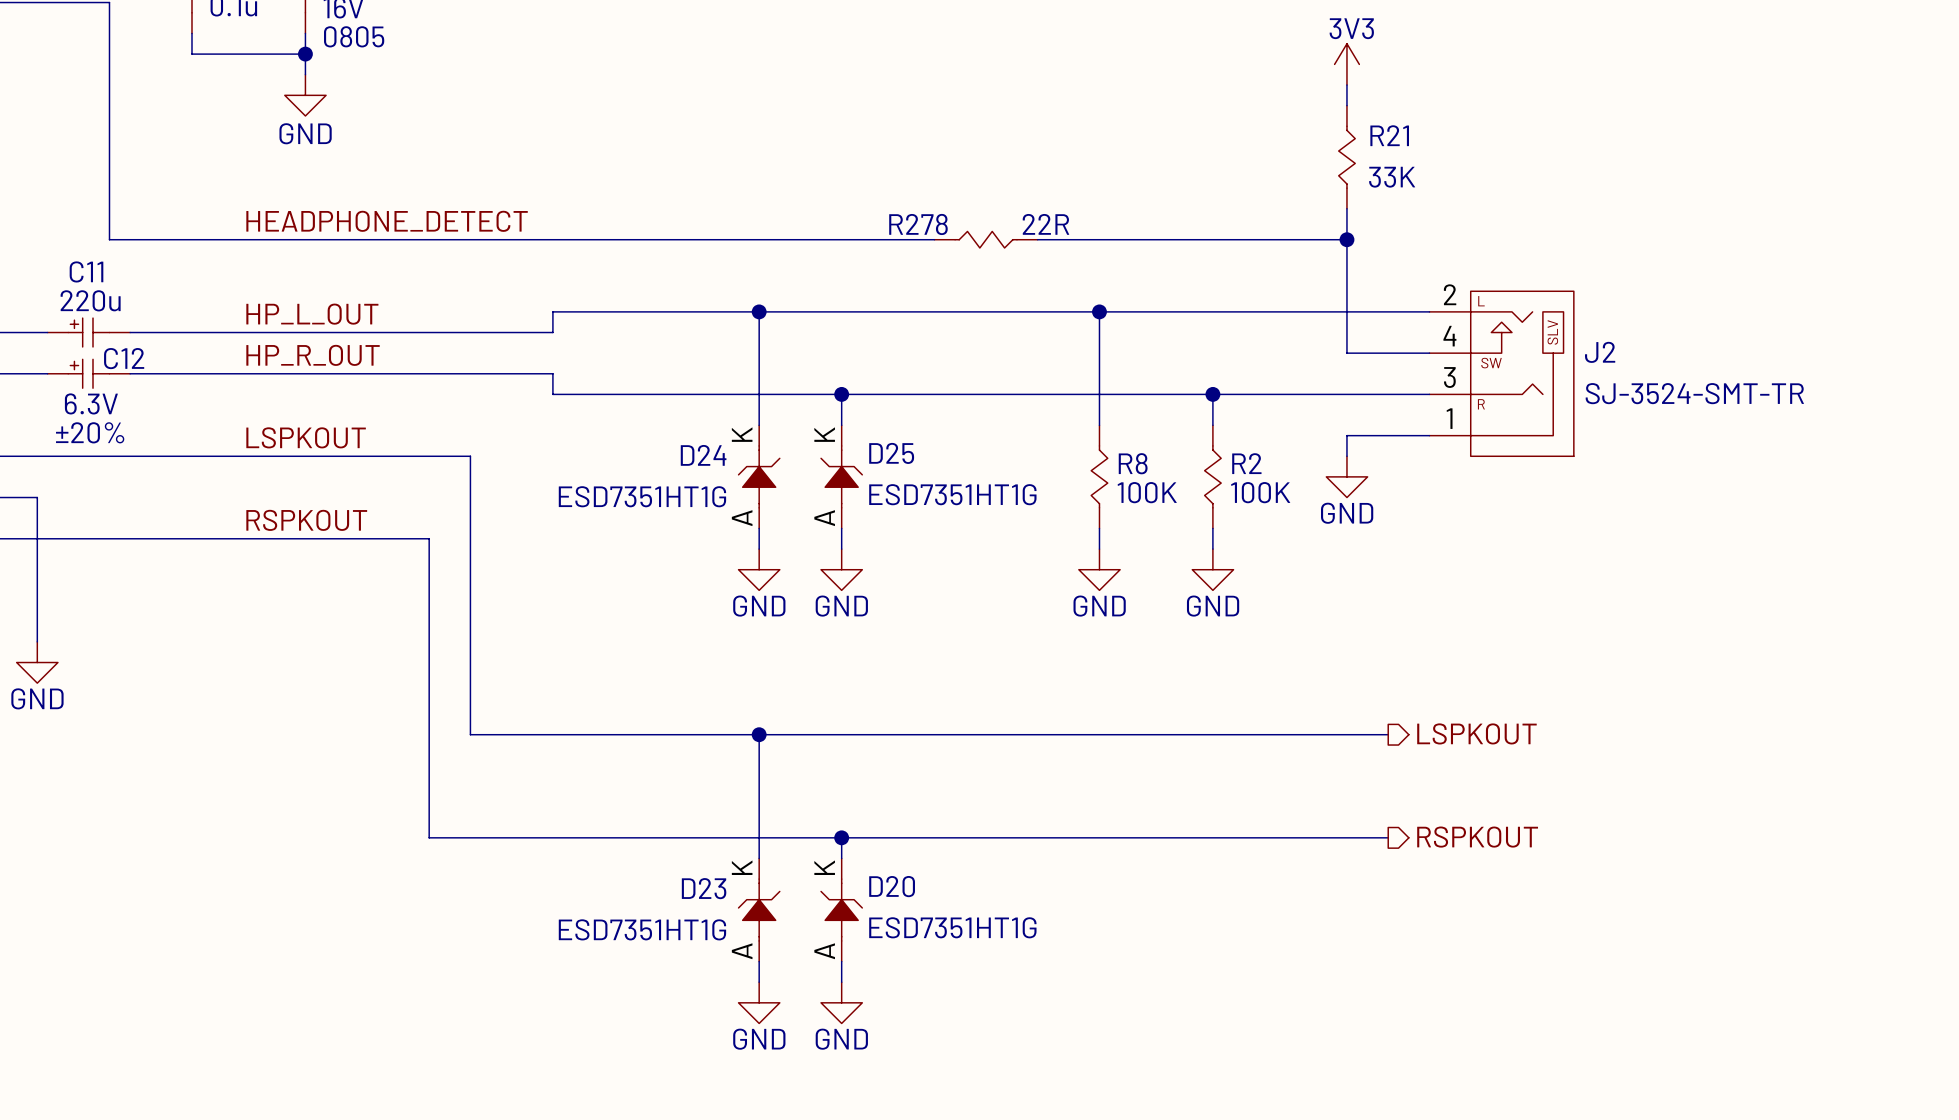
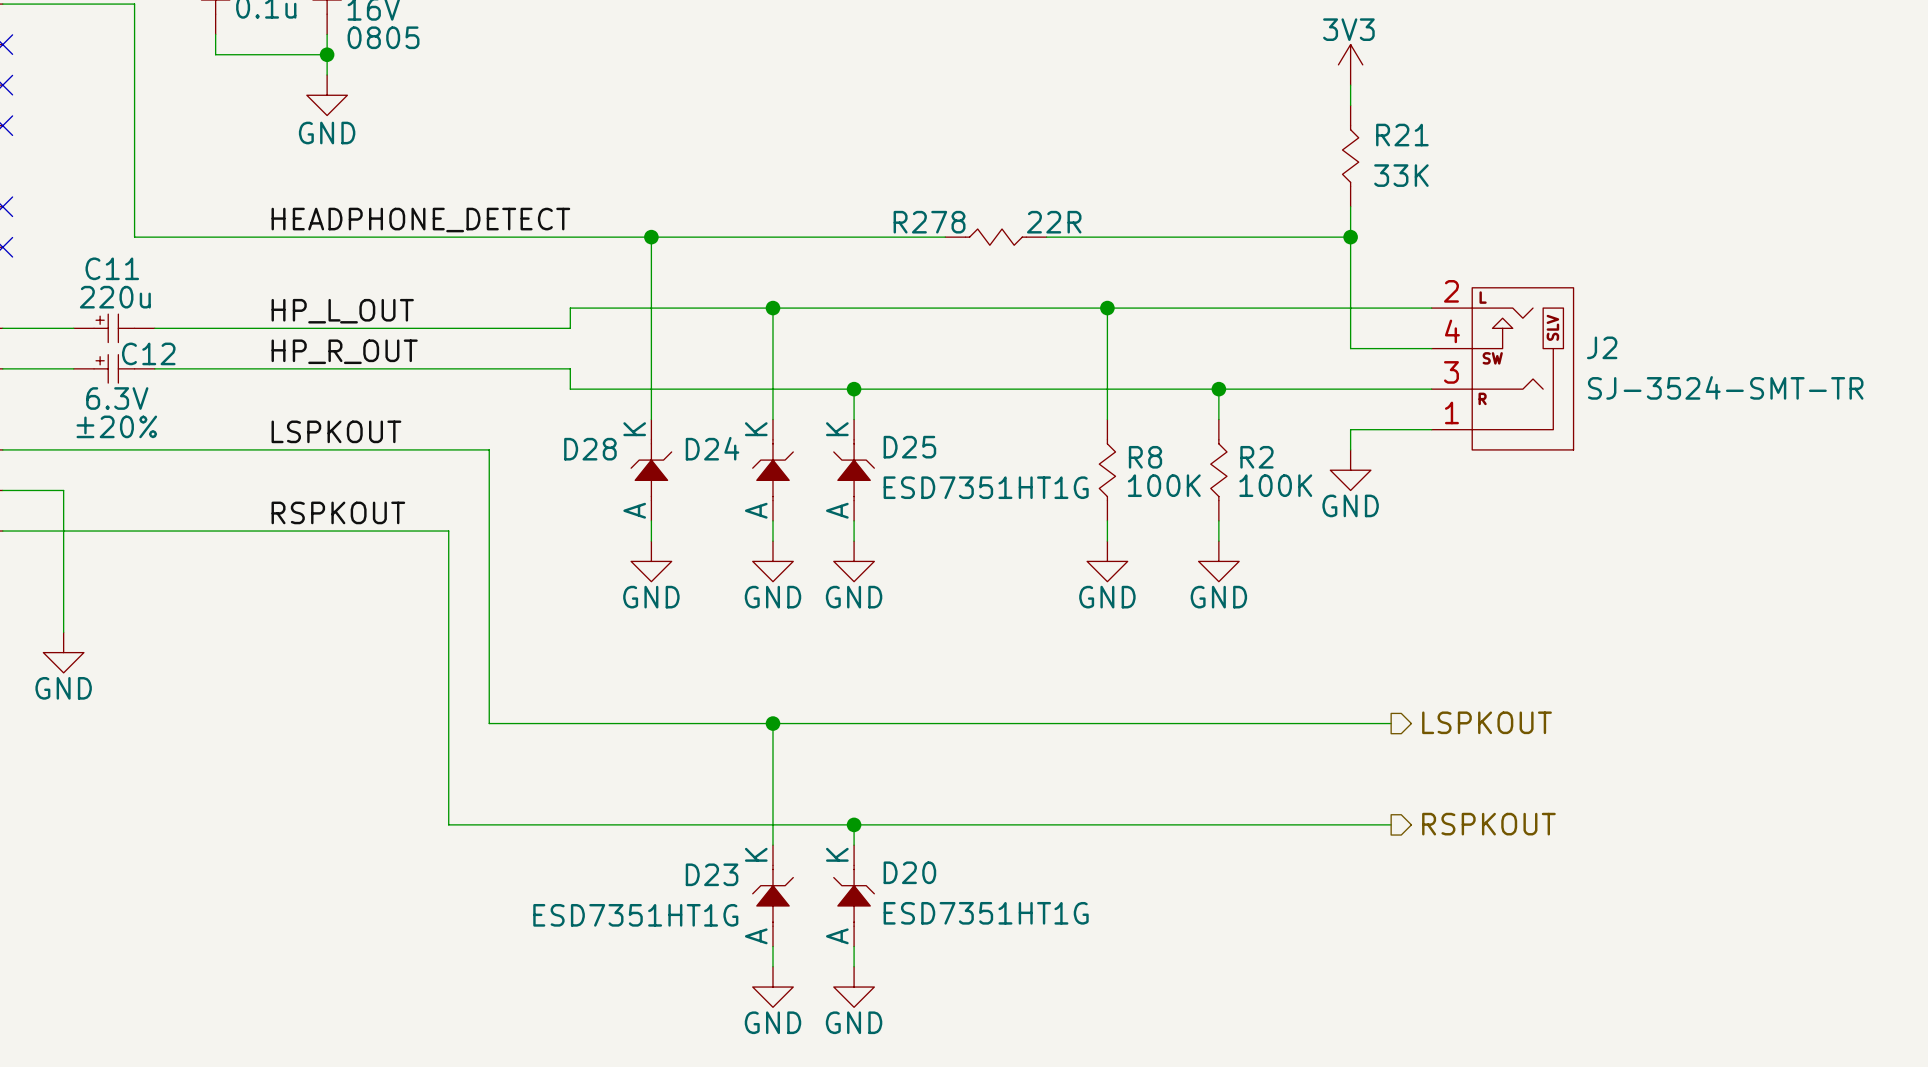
wire: none -> (651, 237) (651, 419)
junction: none -> (651, 237)
D28: none -> (651, 470)
D24 value: ESD7351HT1G (642, 496) -> none
wire: none -> (651, 520) (651, 541)
power symbol: none -> GND (651, 561)

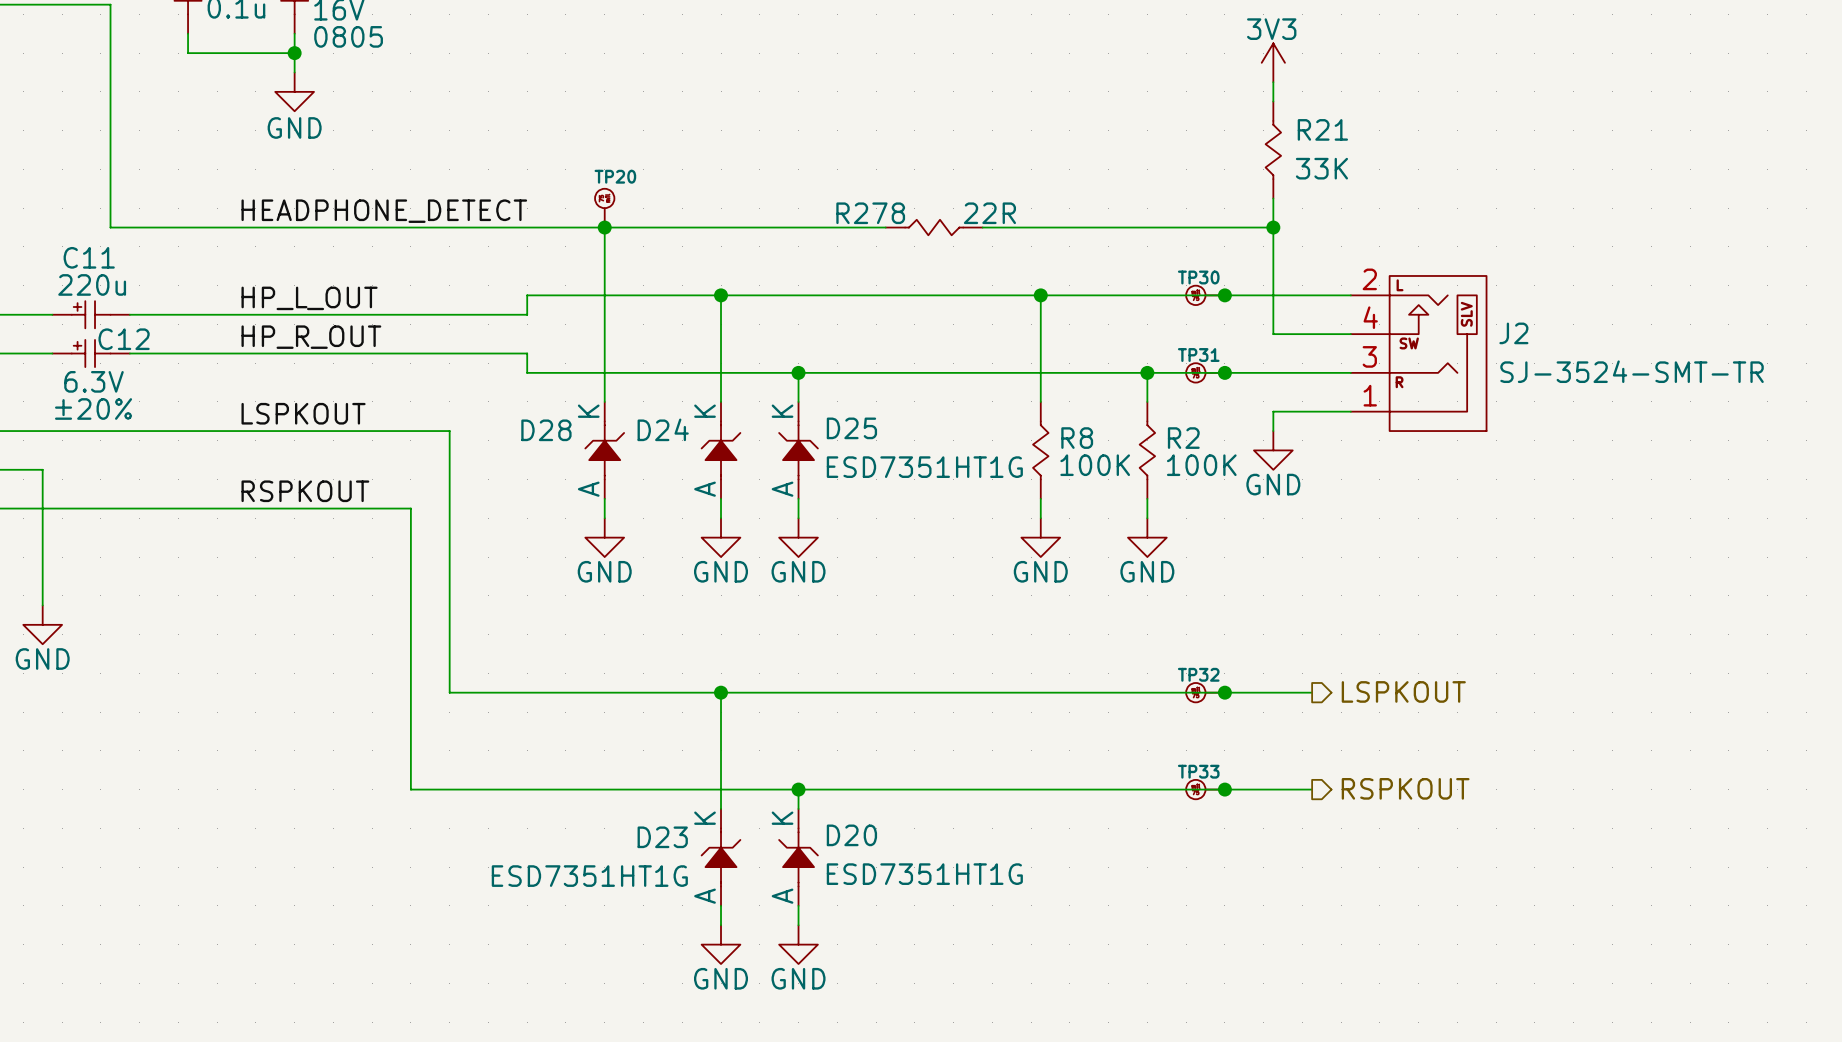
TP20: none -> (604, 208)
TP30: none -> (1205, 295)
junction: none -> (1224, 295)
TP31: none -> (1205, 372)
junction: none -> (1224, 372)
TP32: none -> (1205, 692)
junction: none -> (1224, 692)
TP33: none -> (1205, 789)
junction: none -> (1224, 789)

